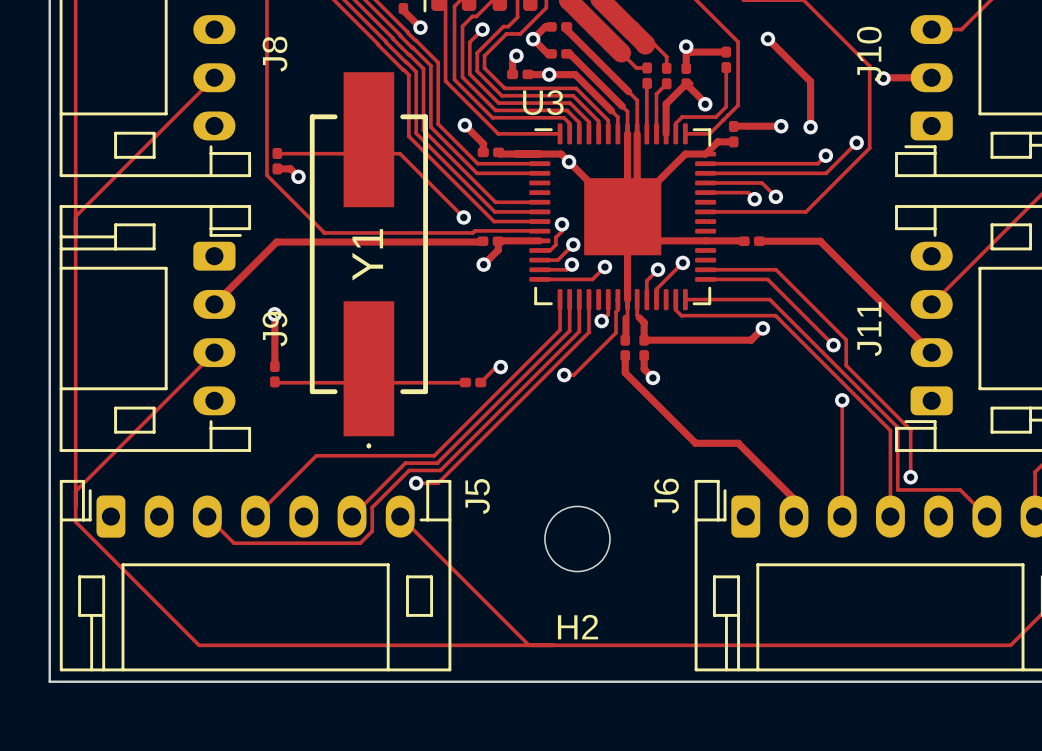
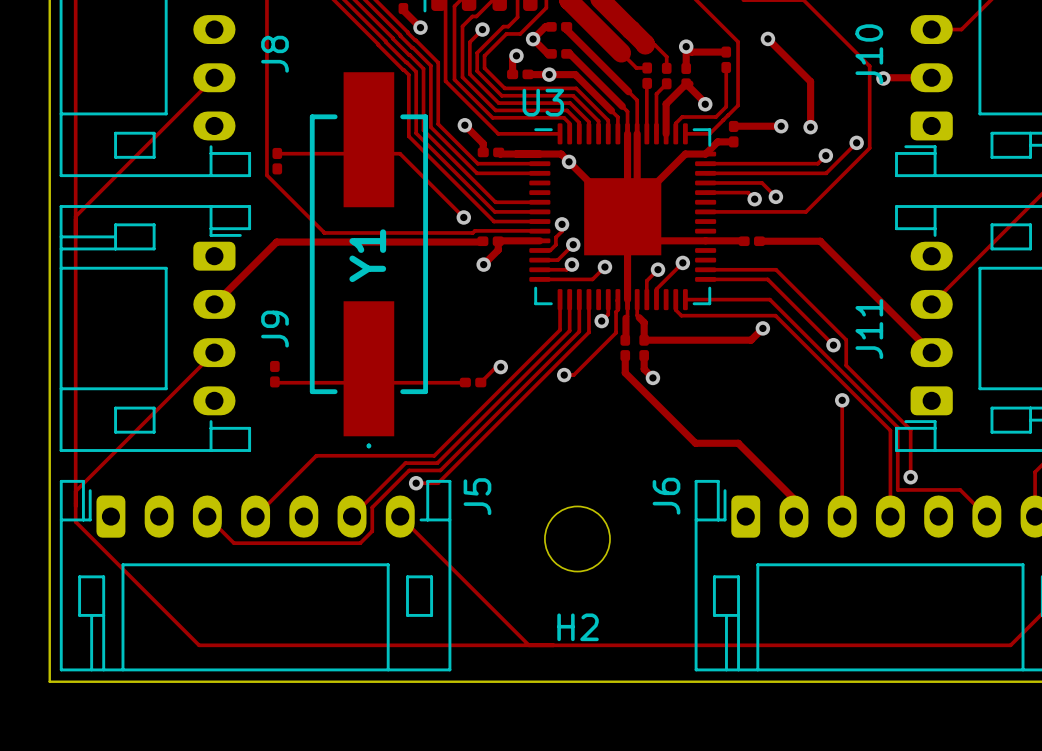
track: (277, 168) (290, 168) (298, 176) -> none
via: (298, 176) -> none
track: (274, 314) (274, 366) -> none
via: (274, 314) -> none

